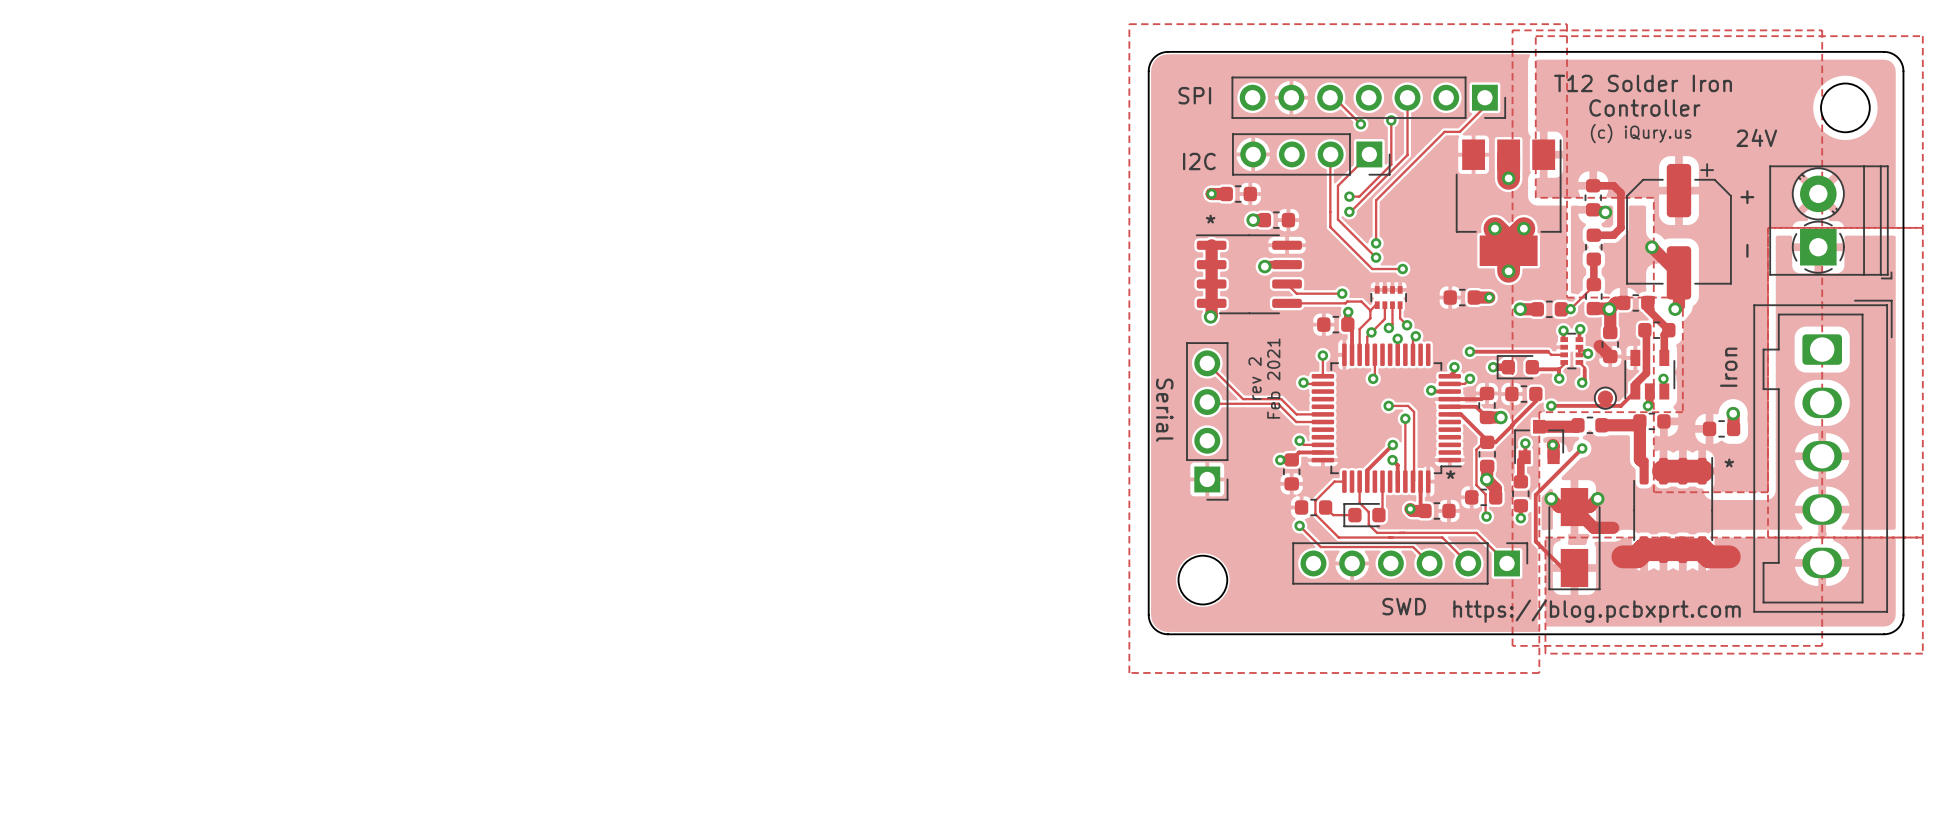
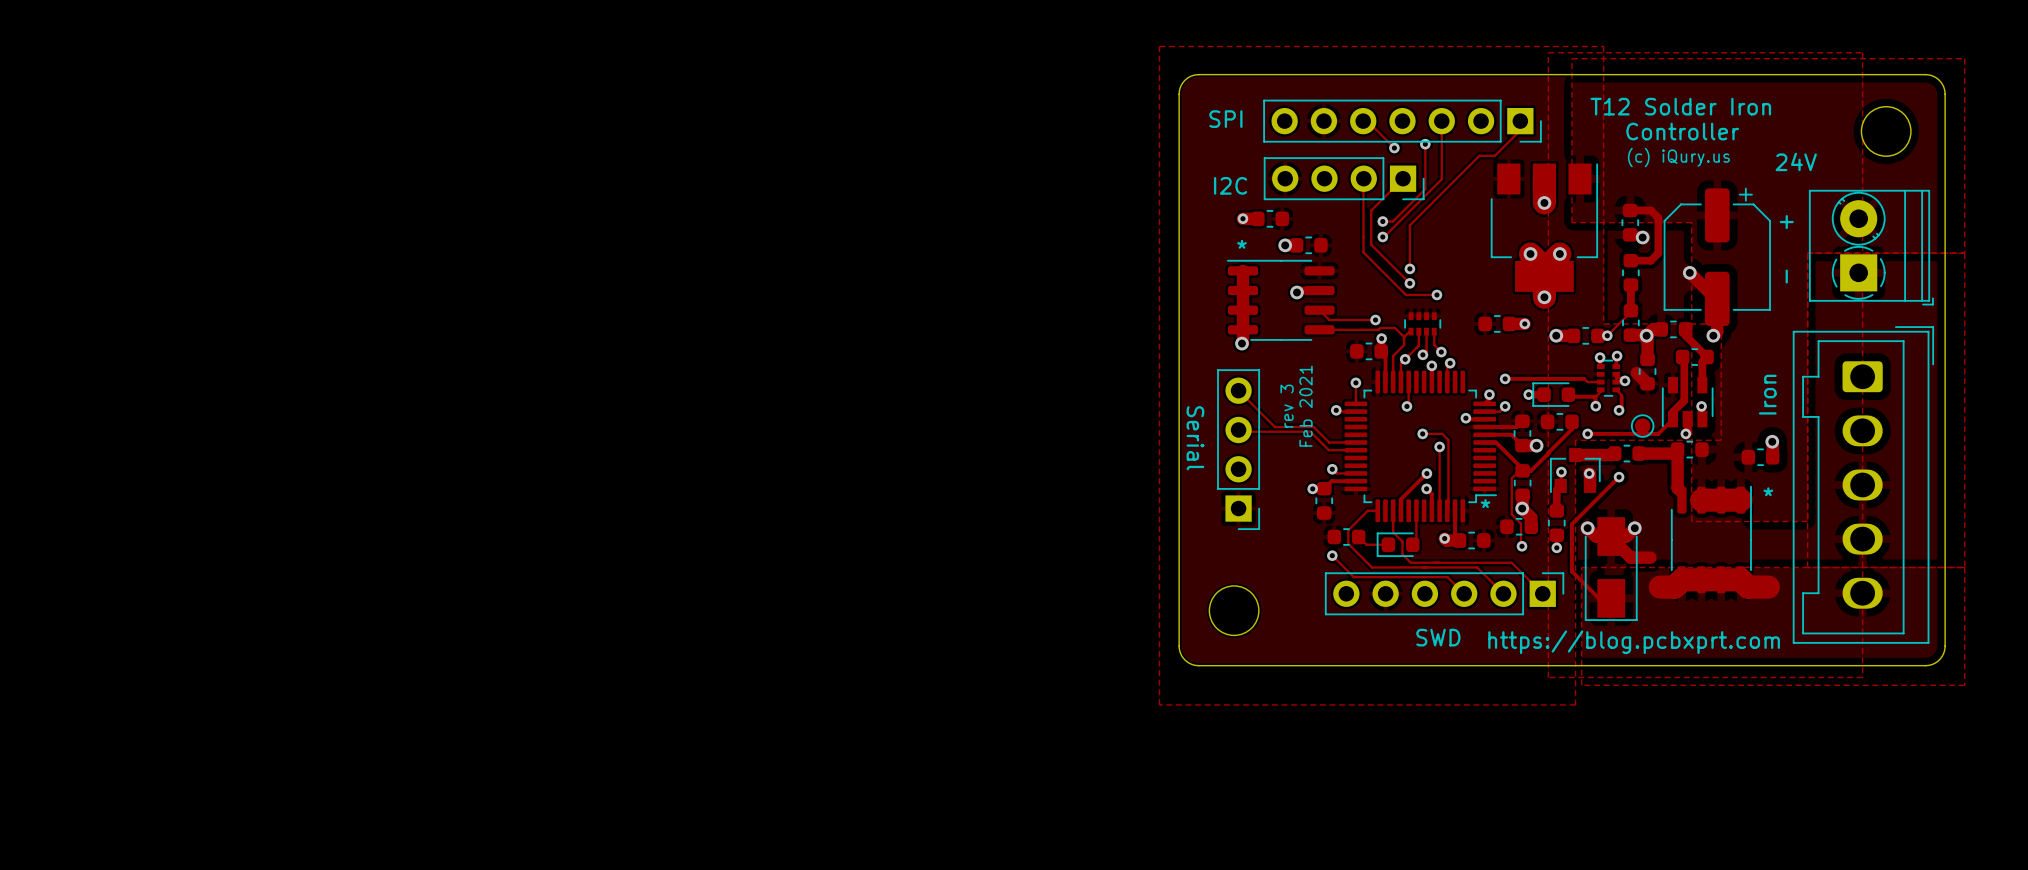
text: rev 2 (1255, 378) -> rev 3 (1287, 406)

